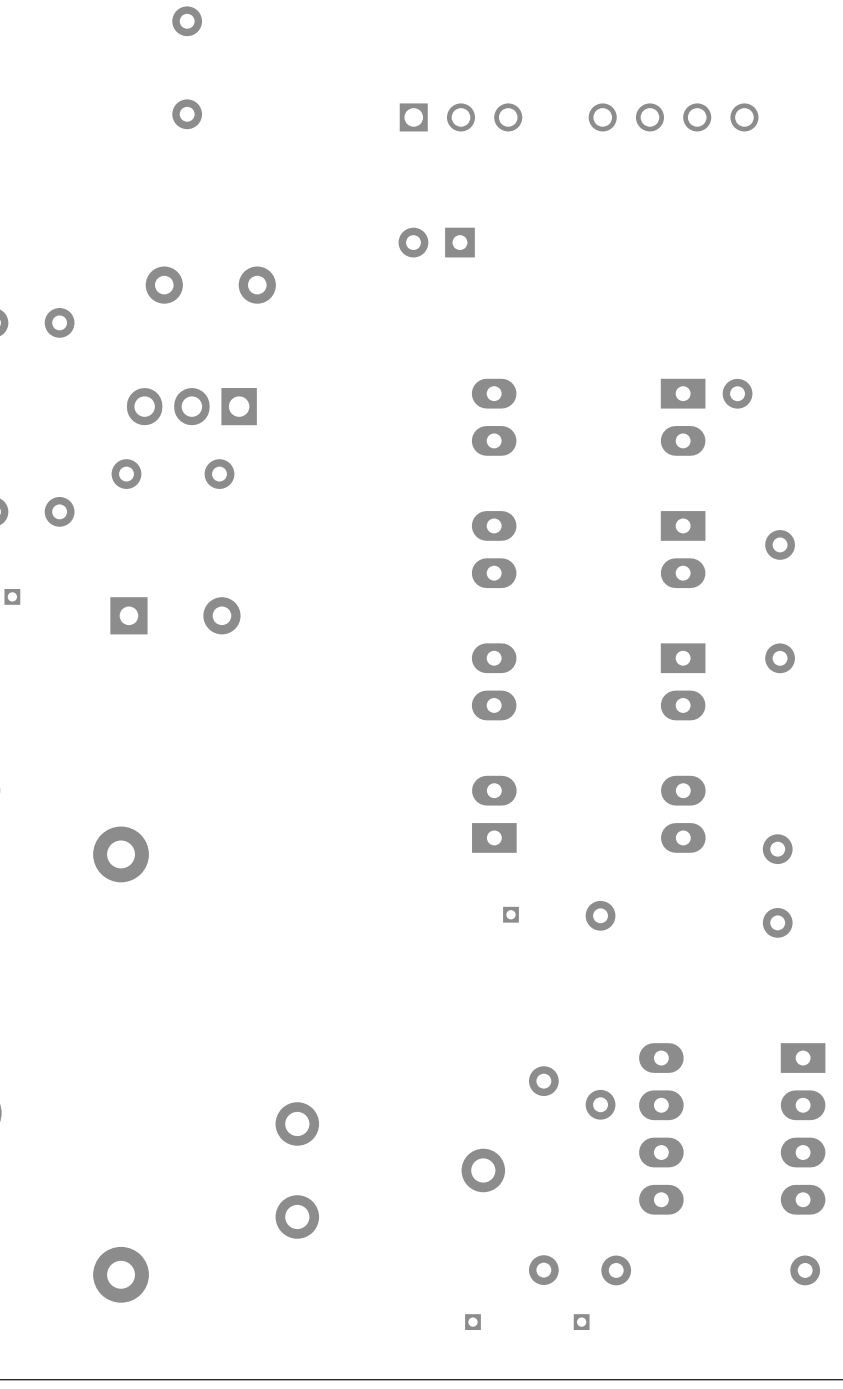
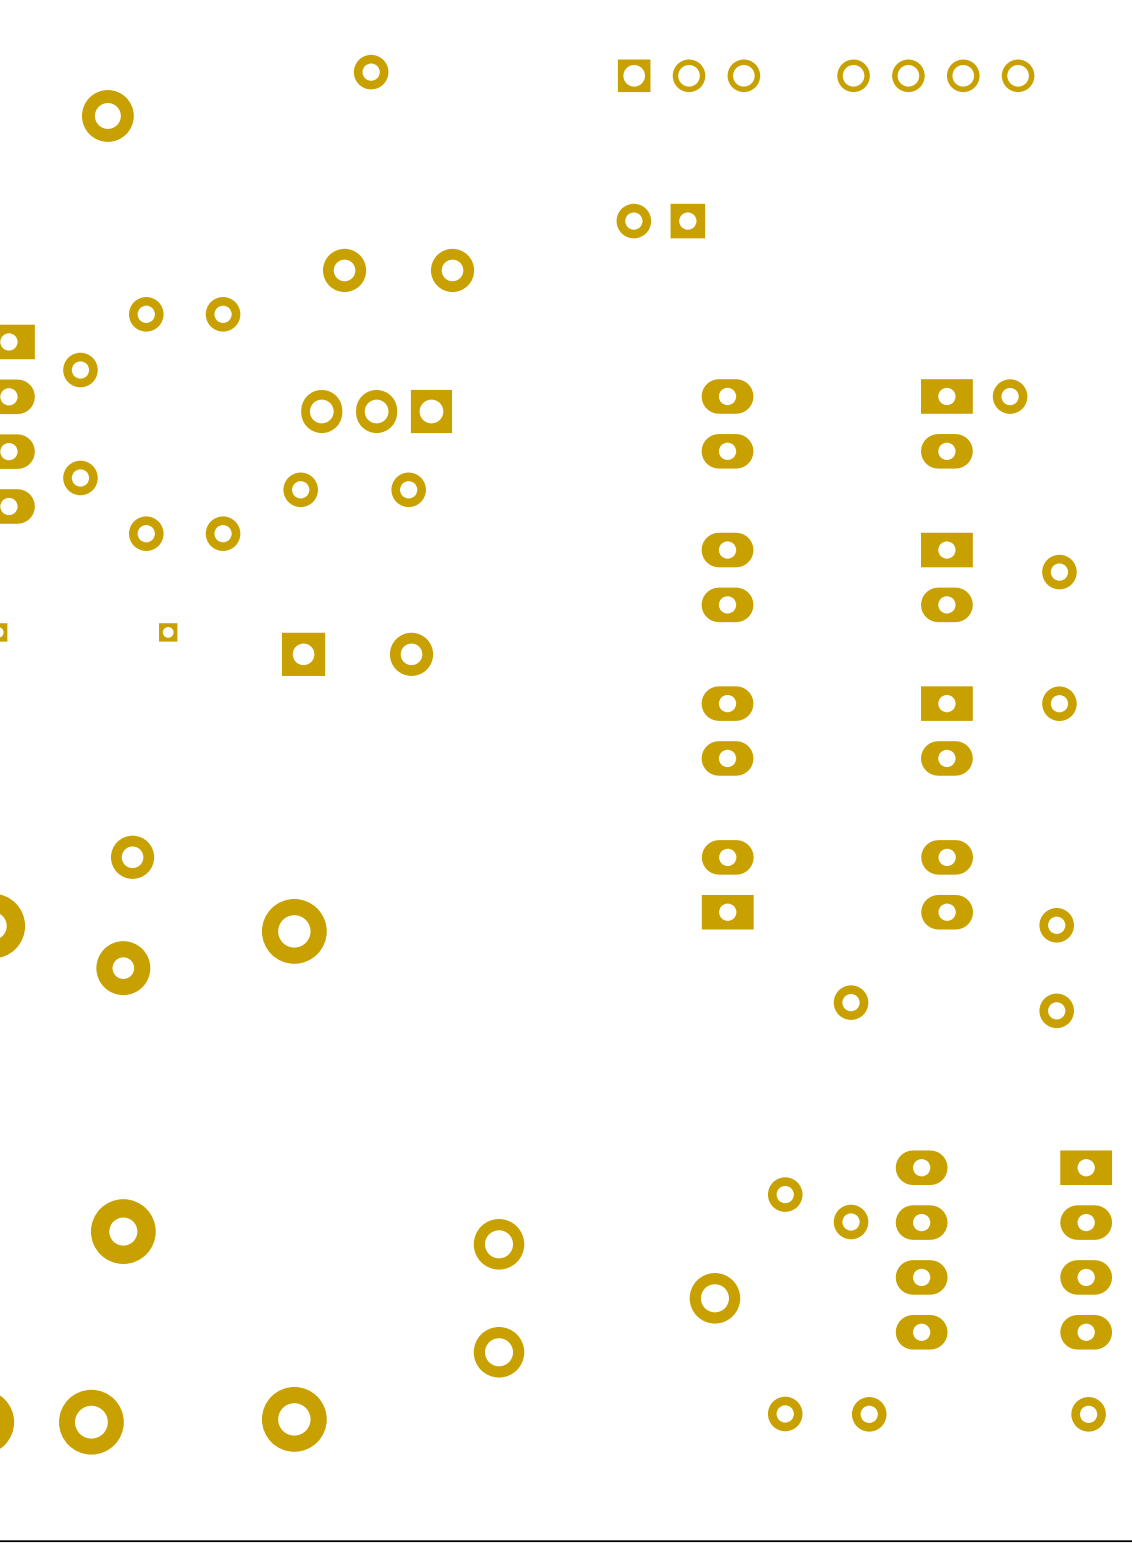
part: (510, 914) -> none
part: (472, 1322) -> none
part: (581, 1322) -> none

